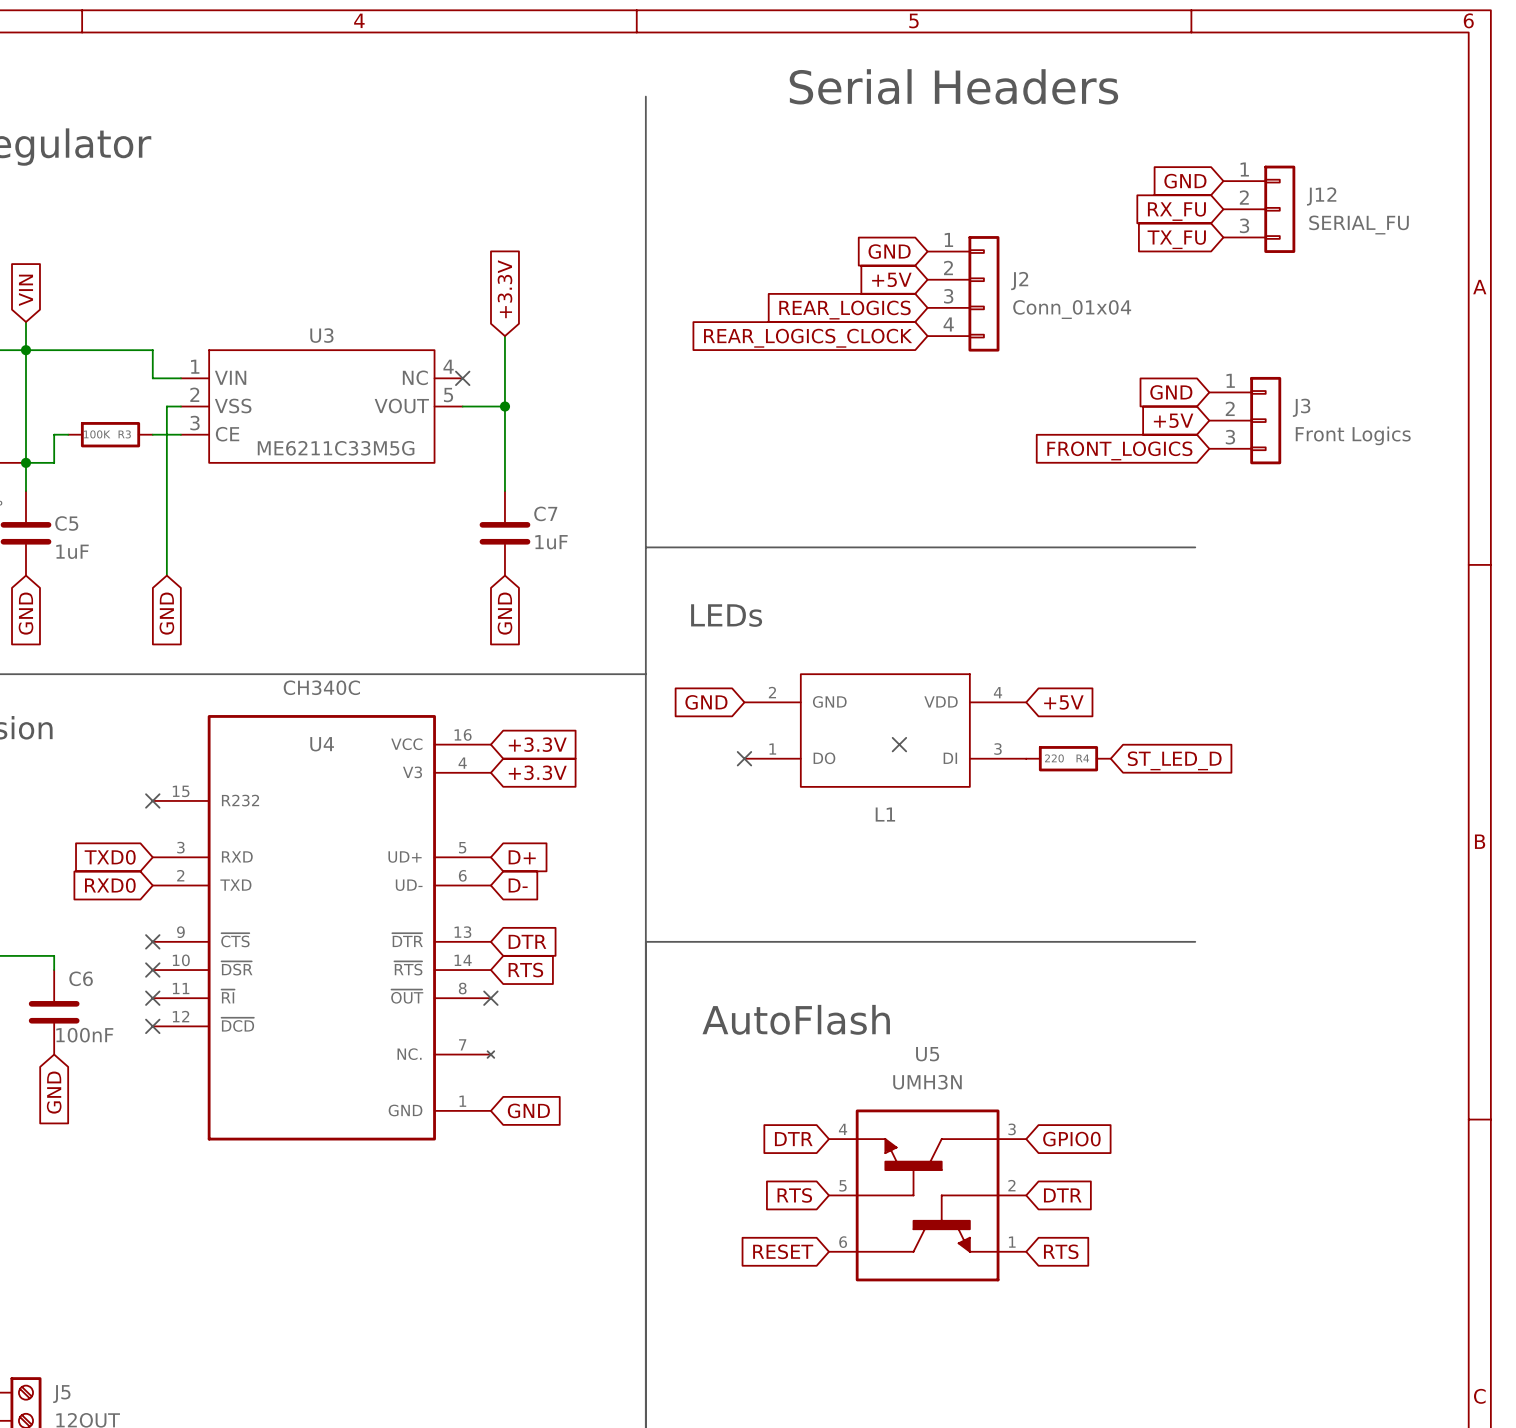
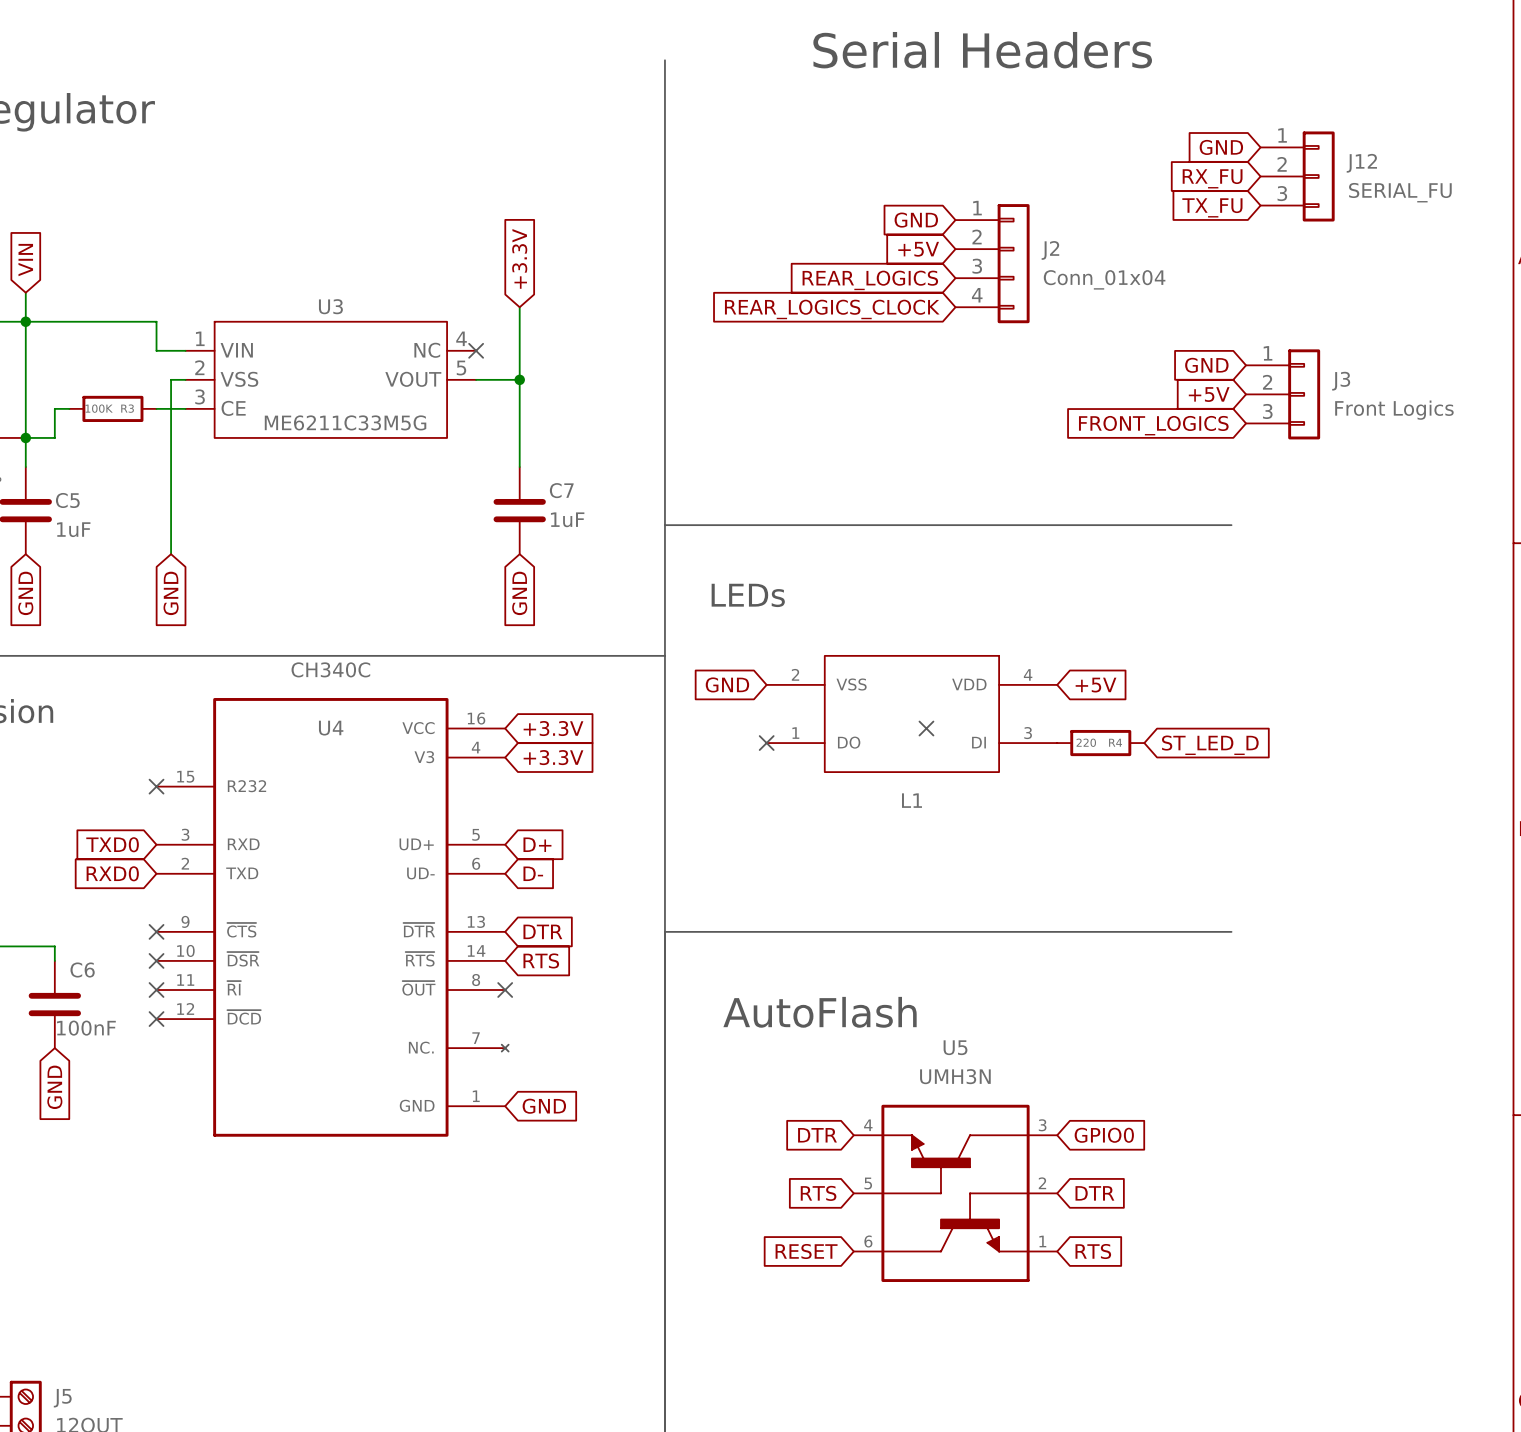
L1 pin name: GND (829, 701) -> VSS (851, 684)

